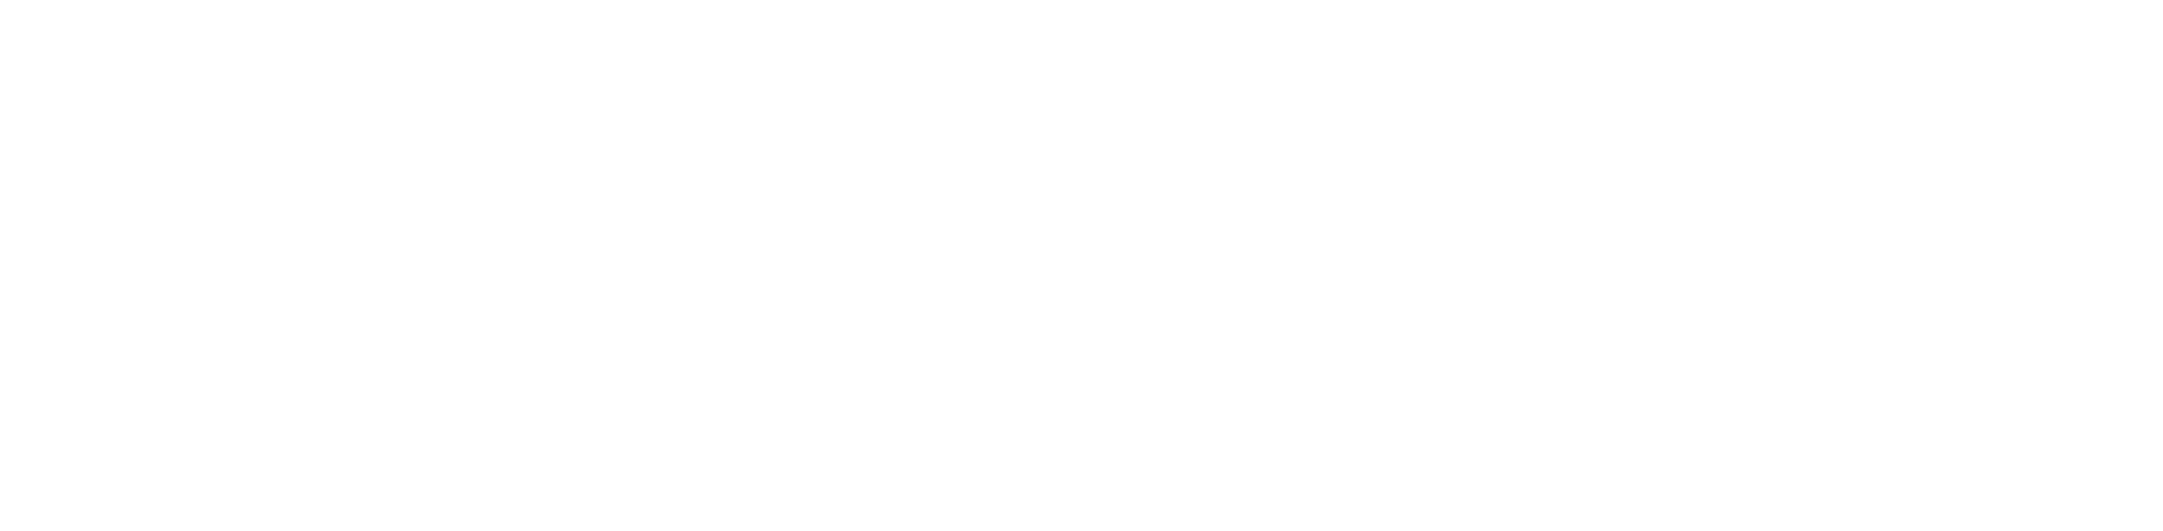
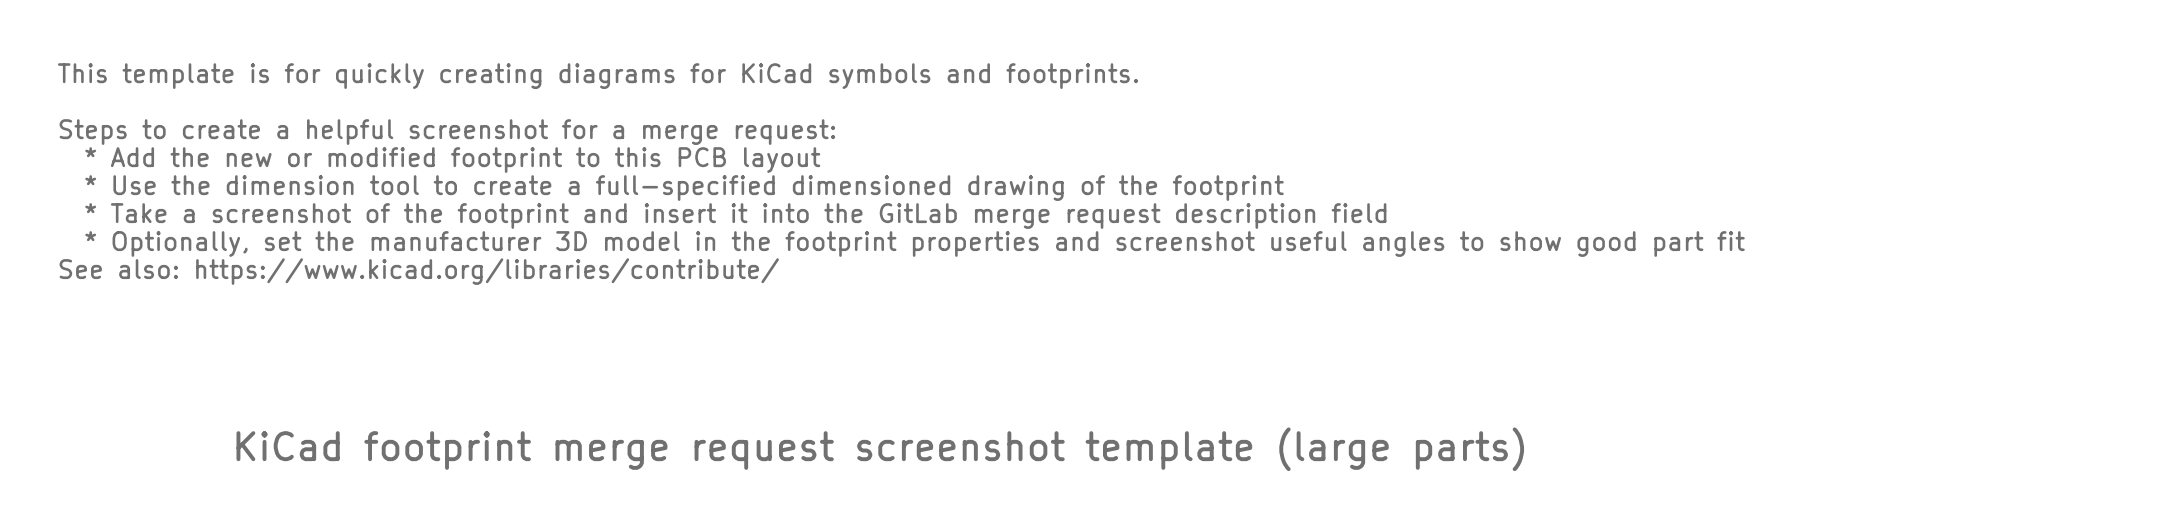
text: none -> This template is for quickly creating diagrams for KiCad symbols and footprints. (598, 76)
text: none -> Steps to create a helpful screenshot for a merge request: (447, 132)
text: none -> * Add the new or modified footprint to this PCB layout (452, 160)
text: none -> * Use the dimension tool to create a full-specified dimensioned drawing of the footprint (684, 188)
text: none -> * Take a screenshot of the footprint and insert it into the GitLab merge request description field (735, 216)
text: none -> * Optionally, set the manufacturer 3D model in the footprint properties and screenshot useful angles to show good part fit (914, 243)
text: none -> See also: https://www.kicad.org/libraries/contribute/ (419, 271)
text: none -> KiCad footprint merge request screenshot template (large parts) (880, 449)

